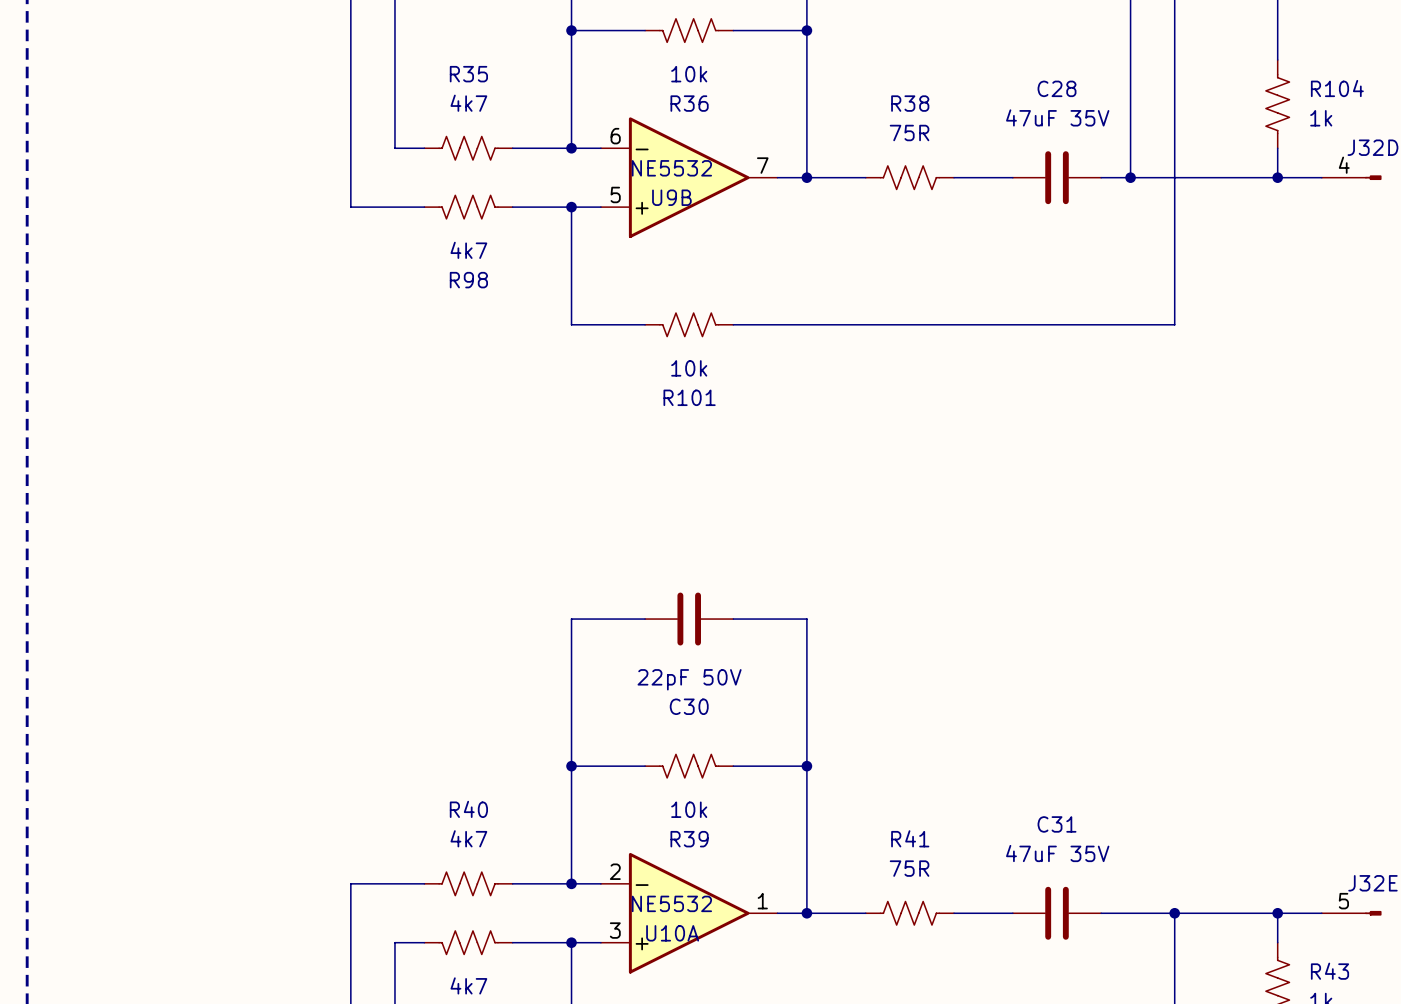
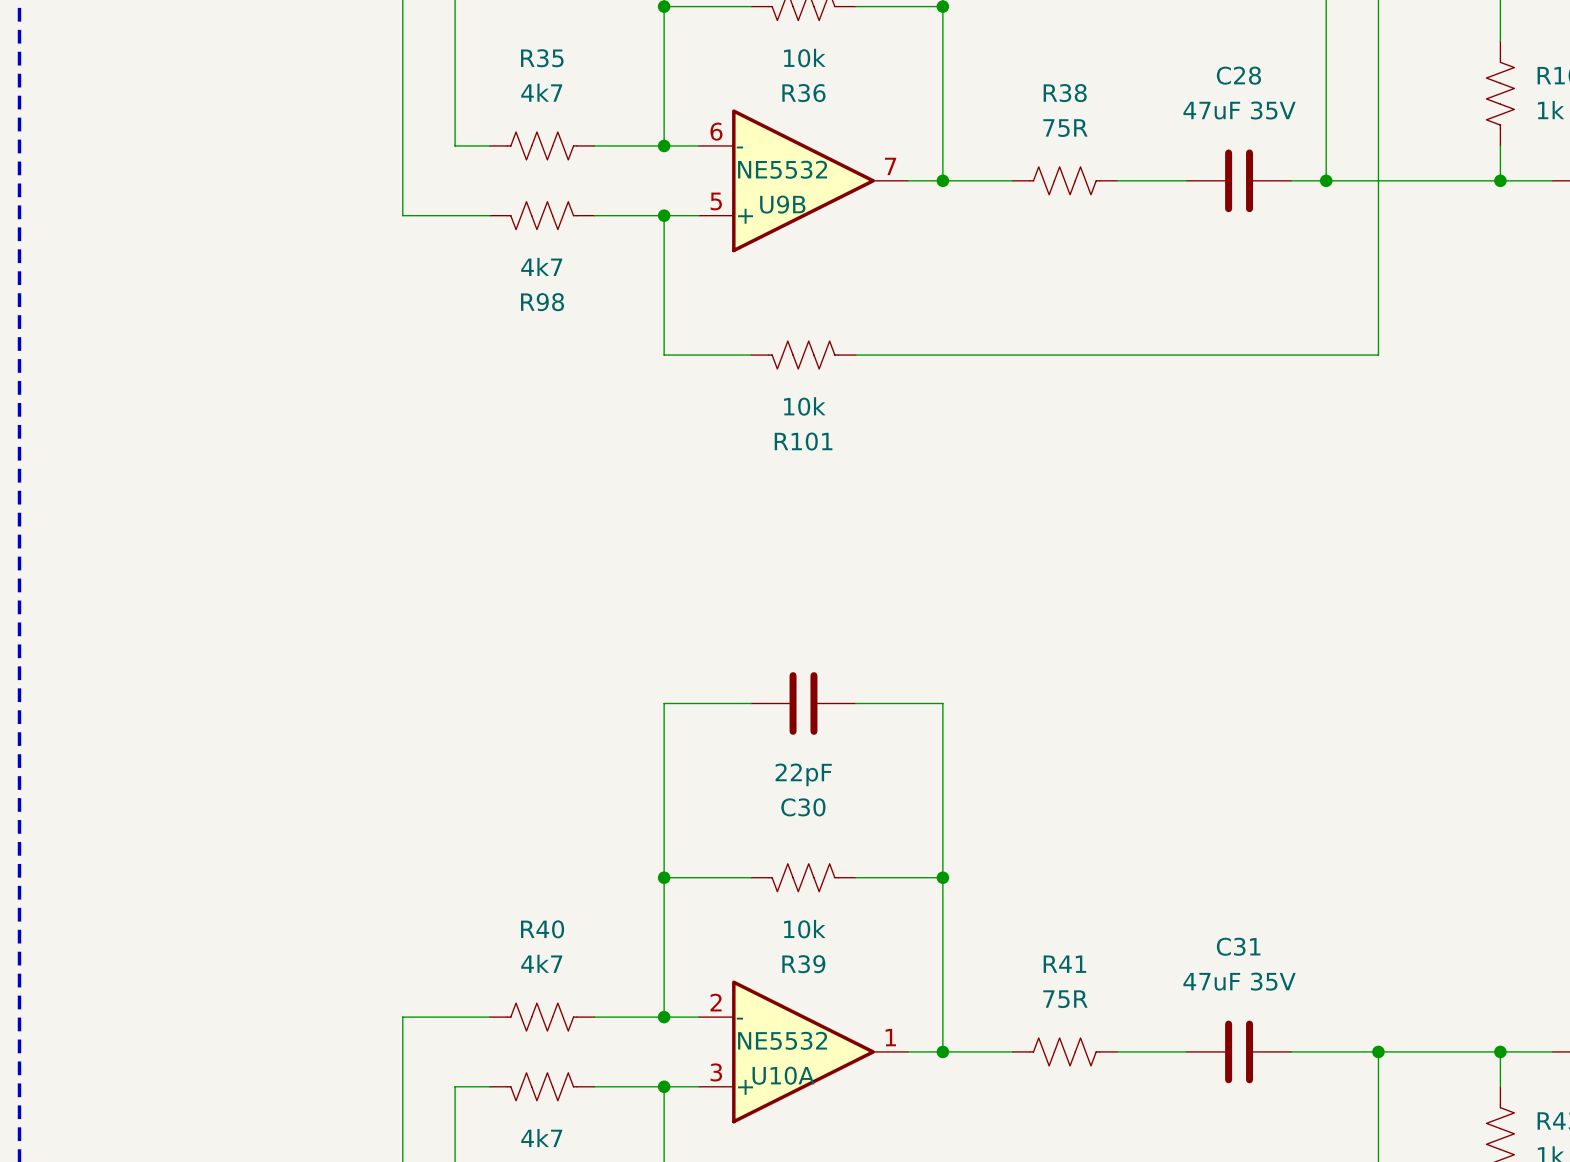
C30 value: 22pF 50V (689, 679) -> 22pF (803, 774)

